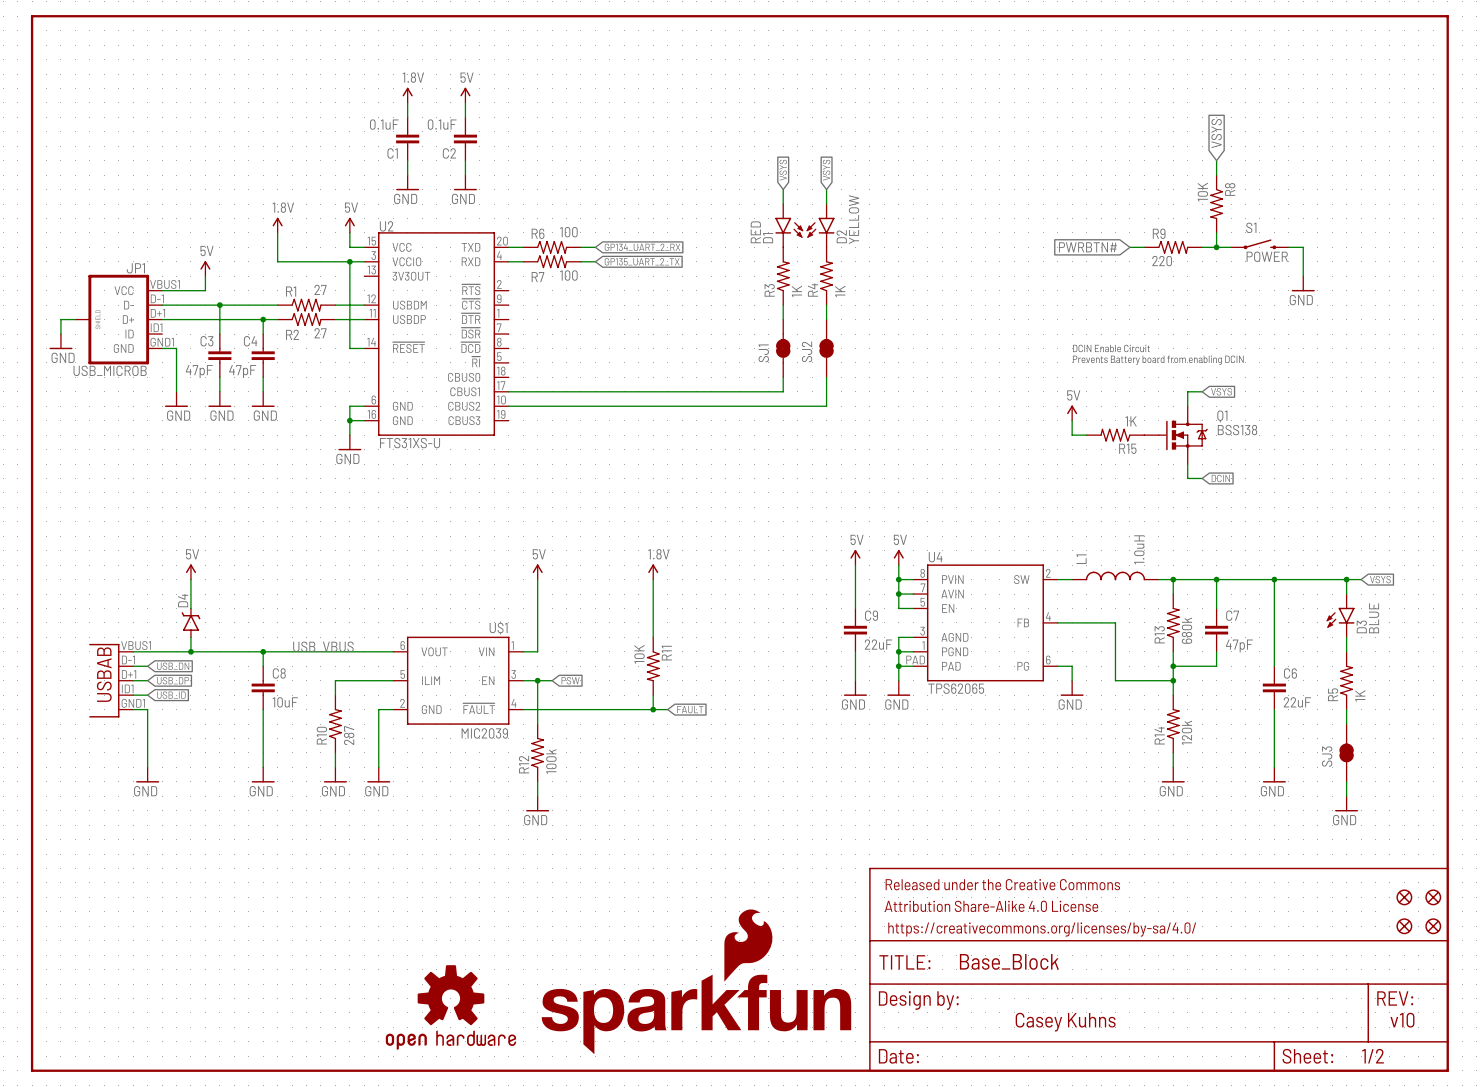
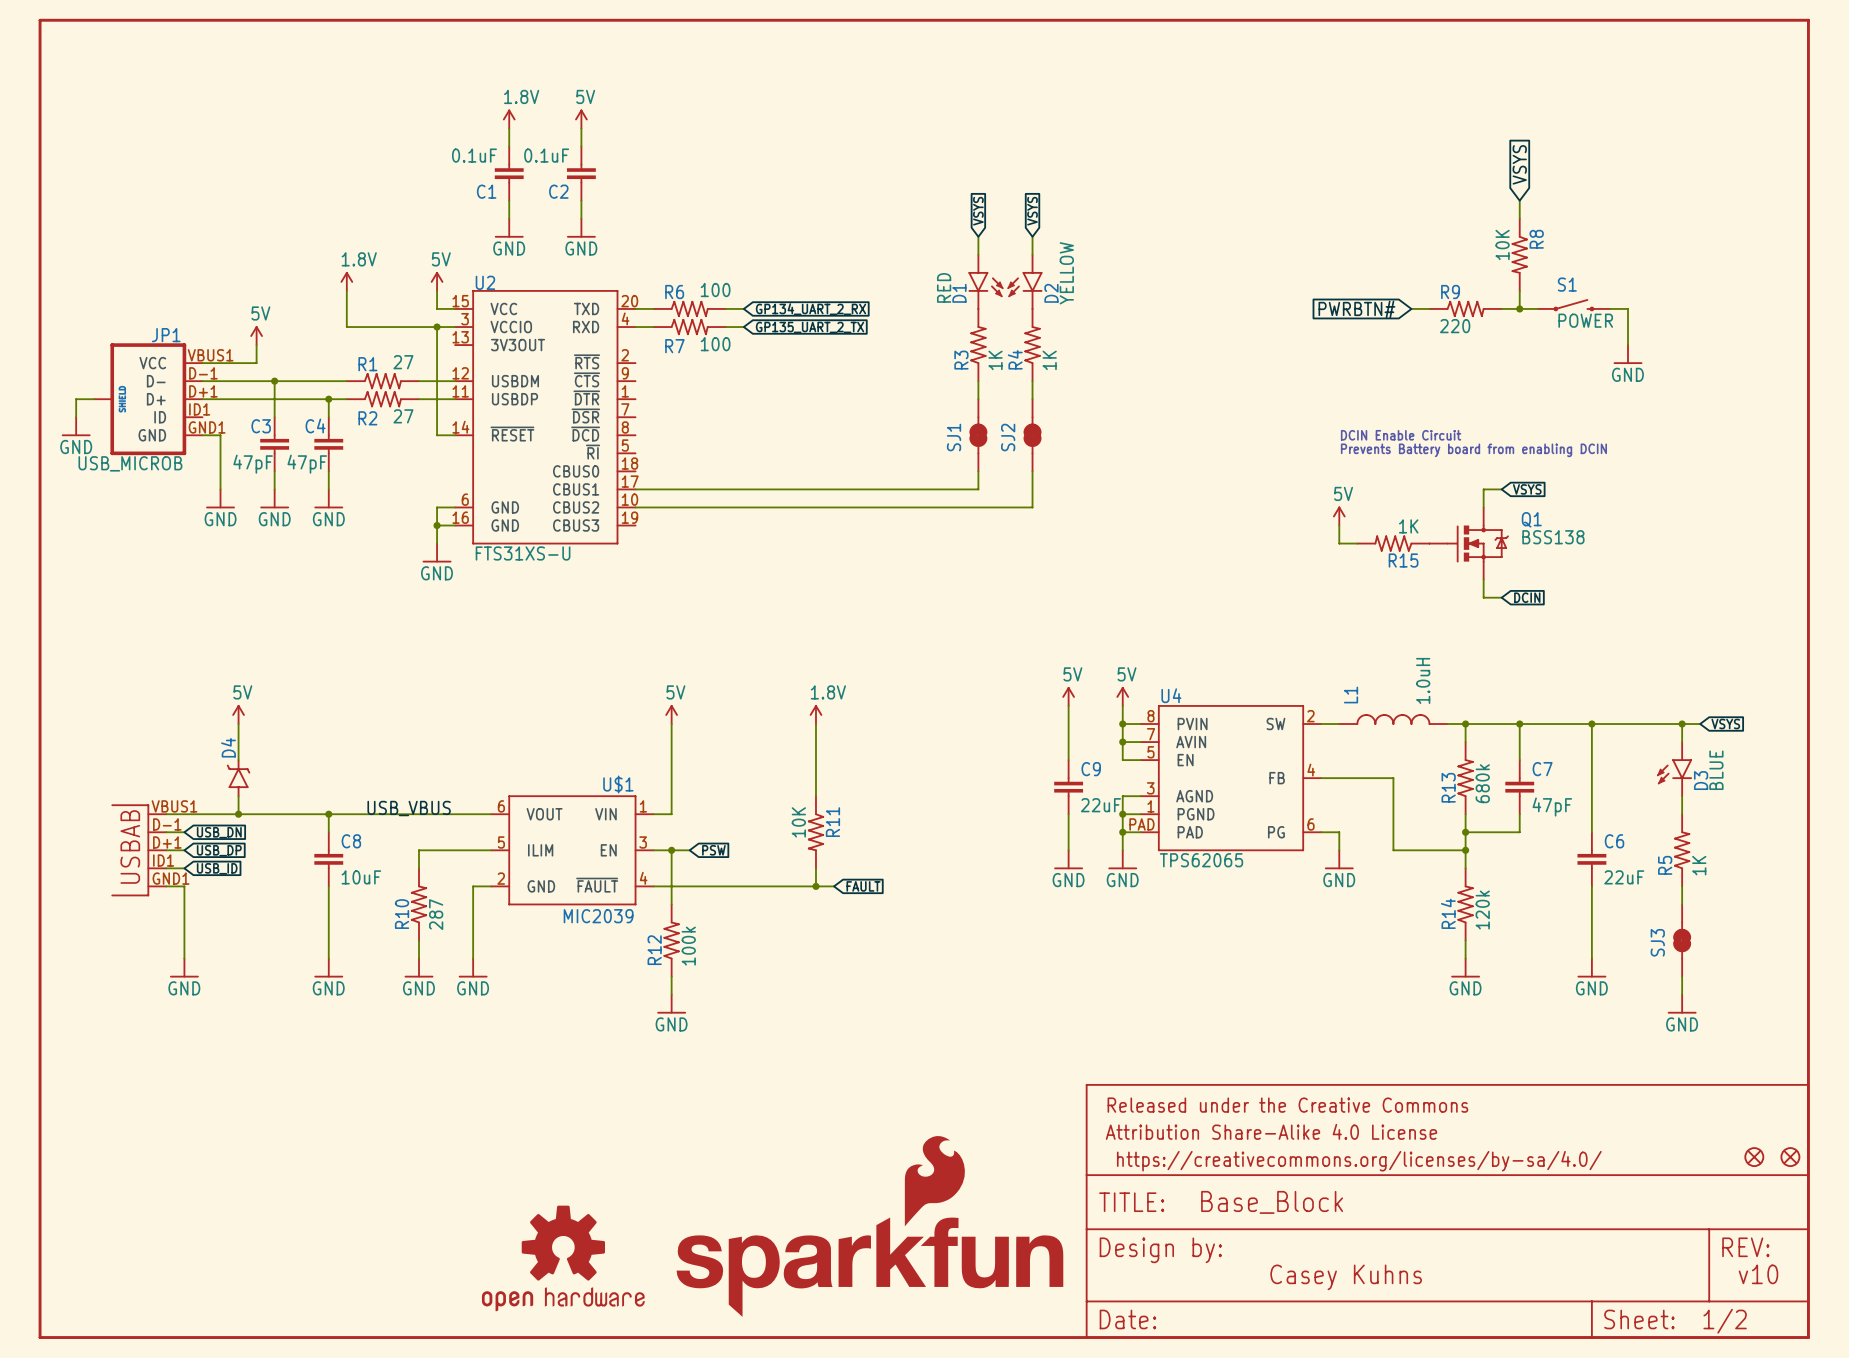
part: (1404, 897) -> none
part: (1433, 897) -> none

